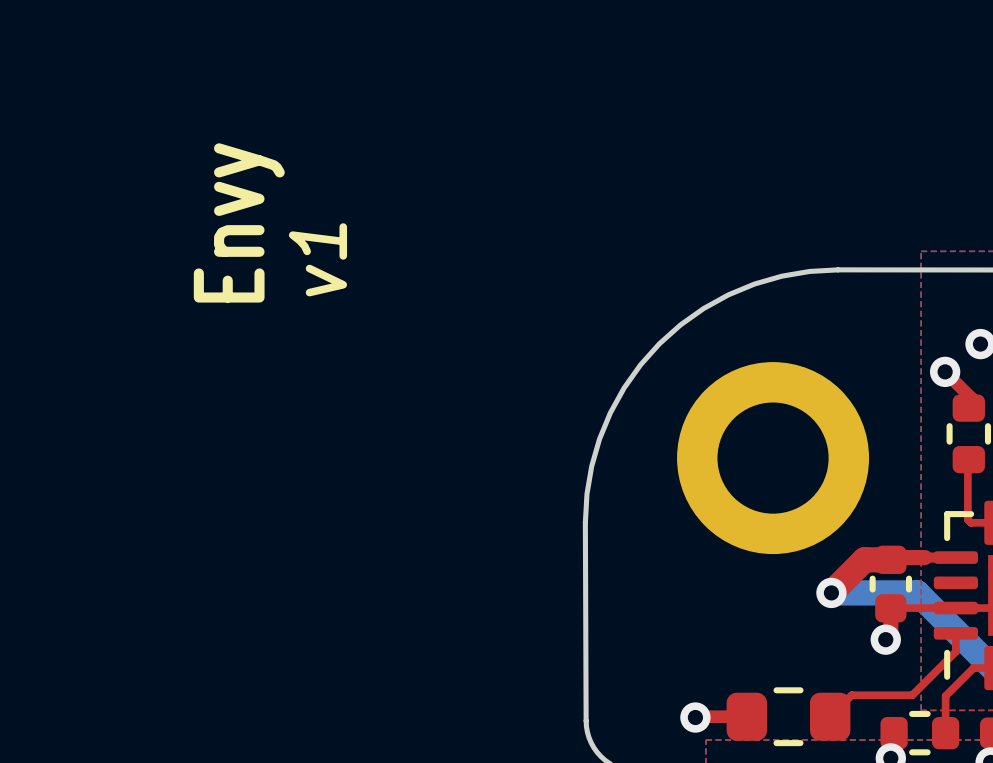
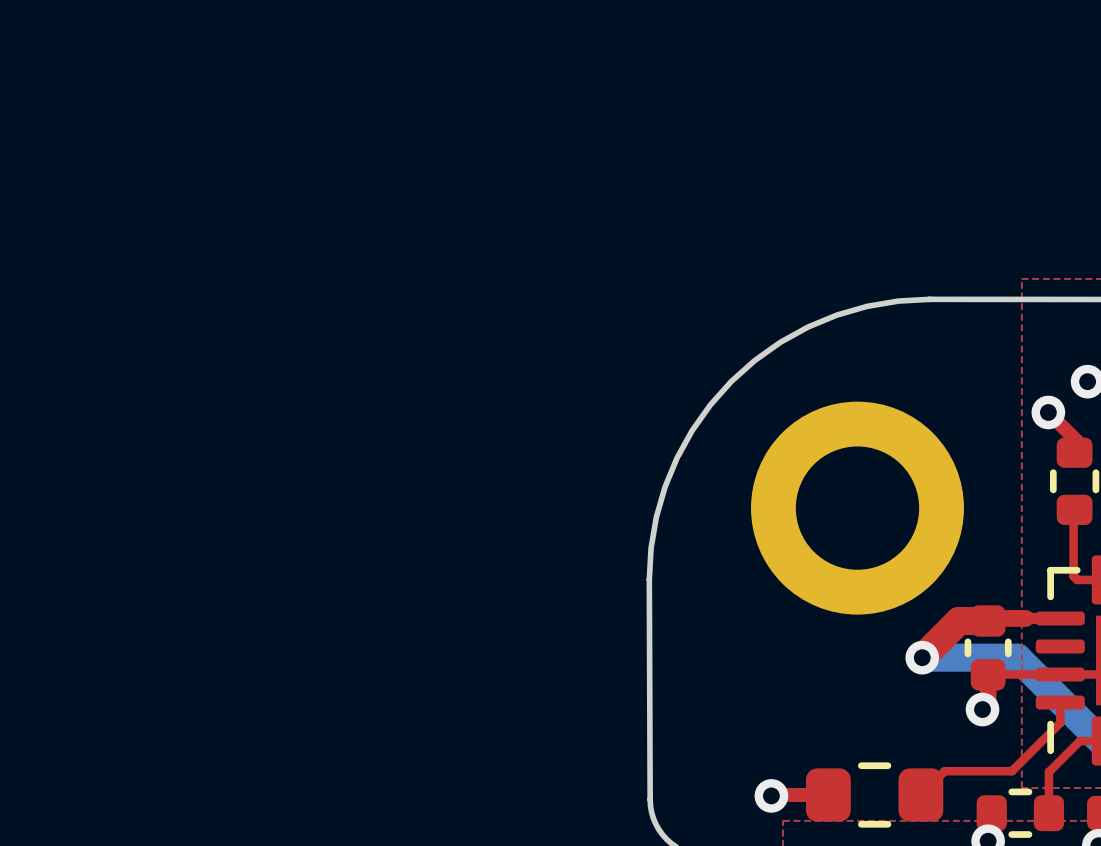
text: Envy (239, 222) -> none
text: v1 (317, 259) -> none

